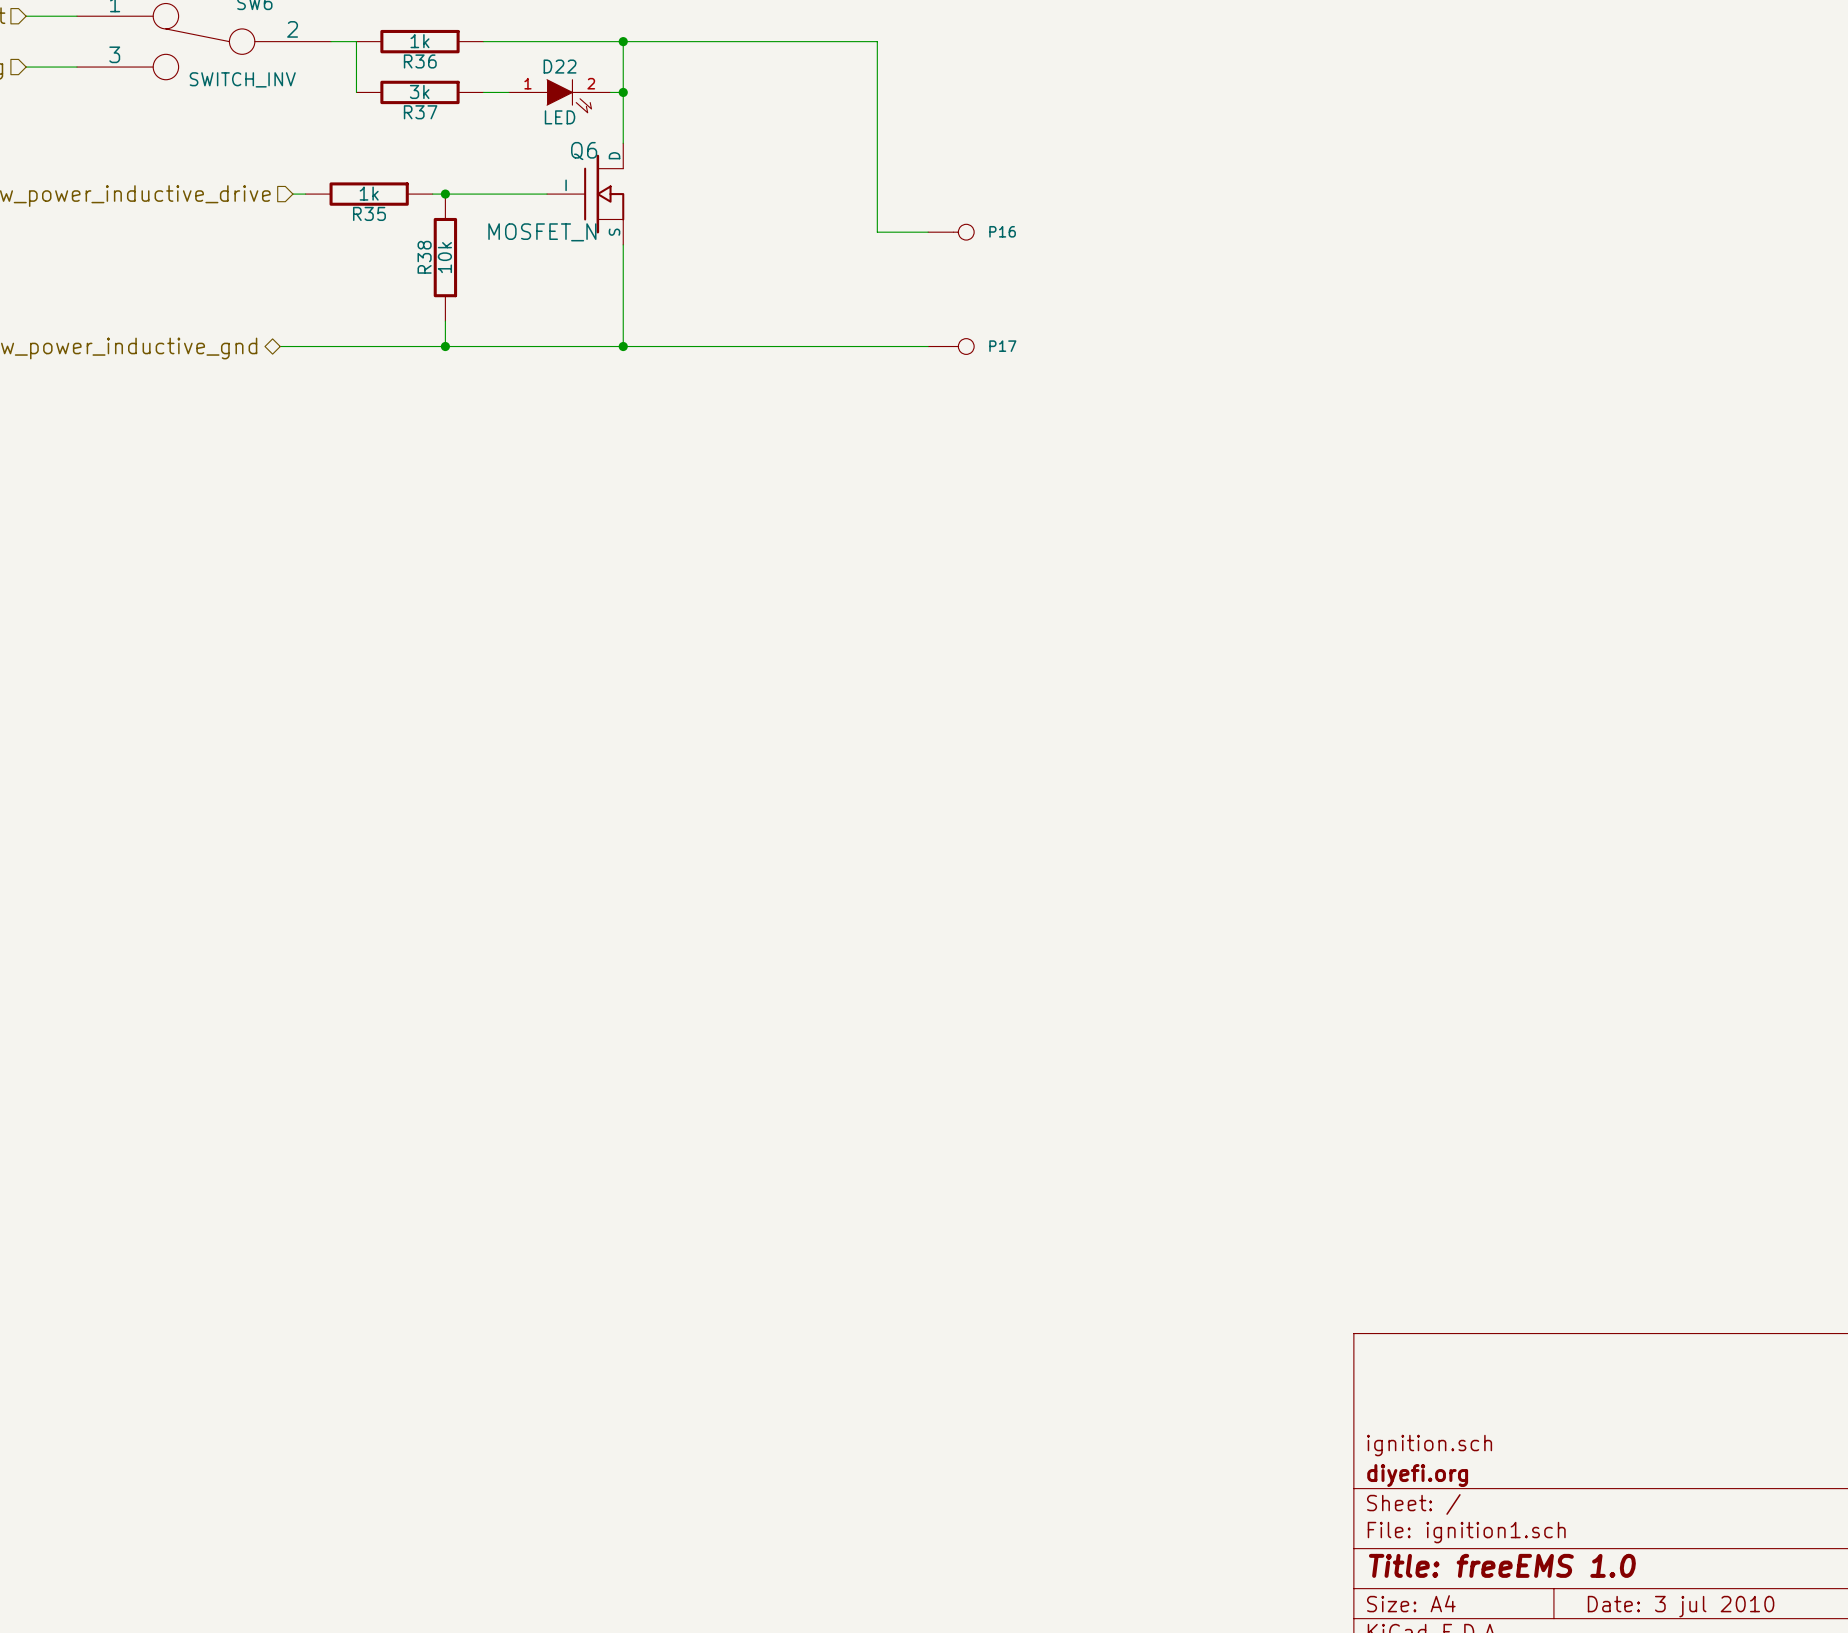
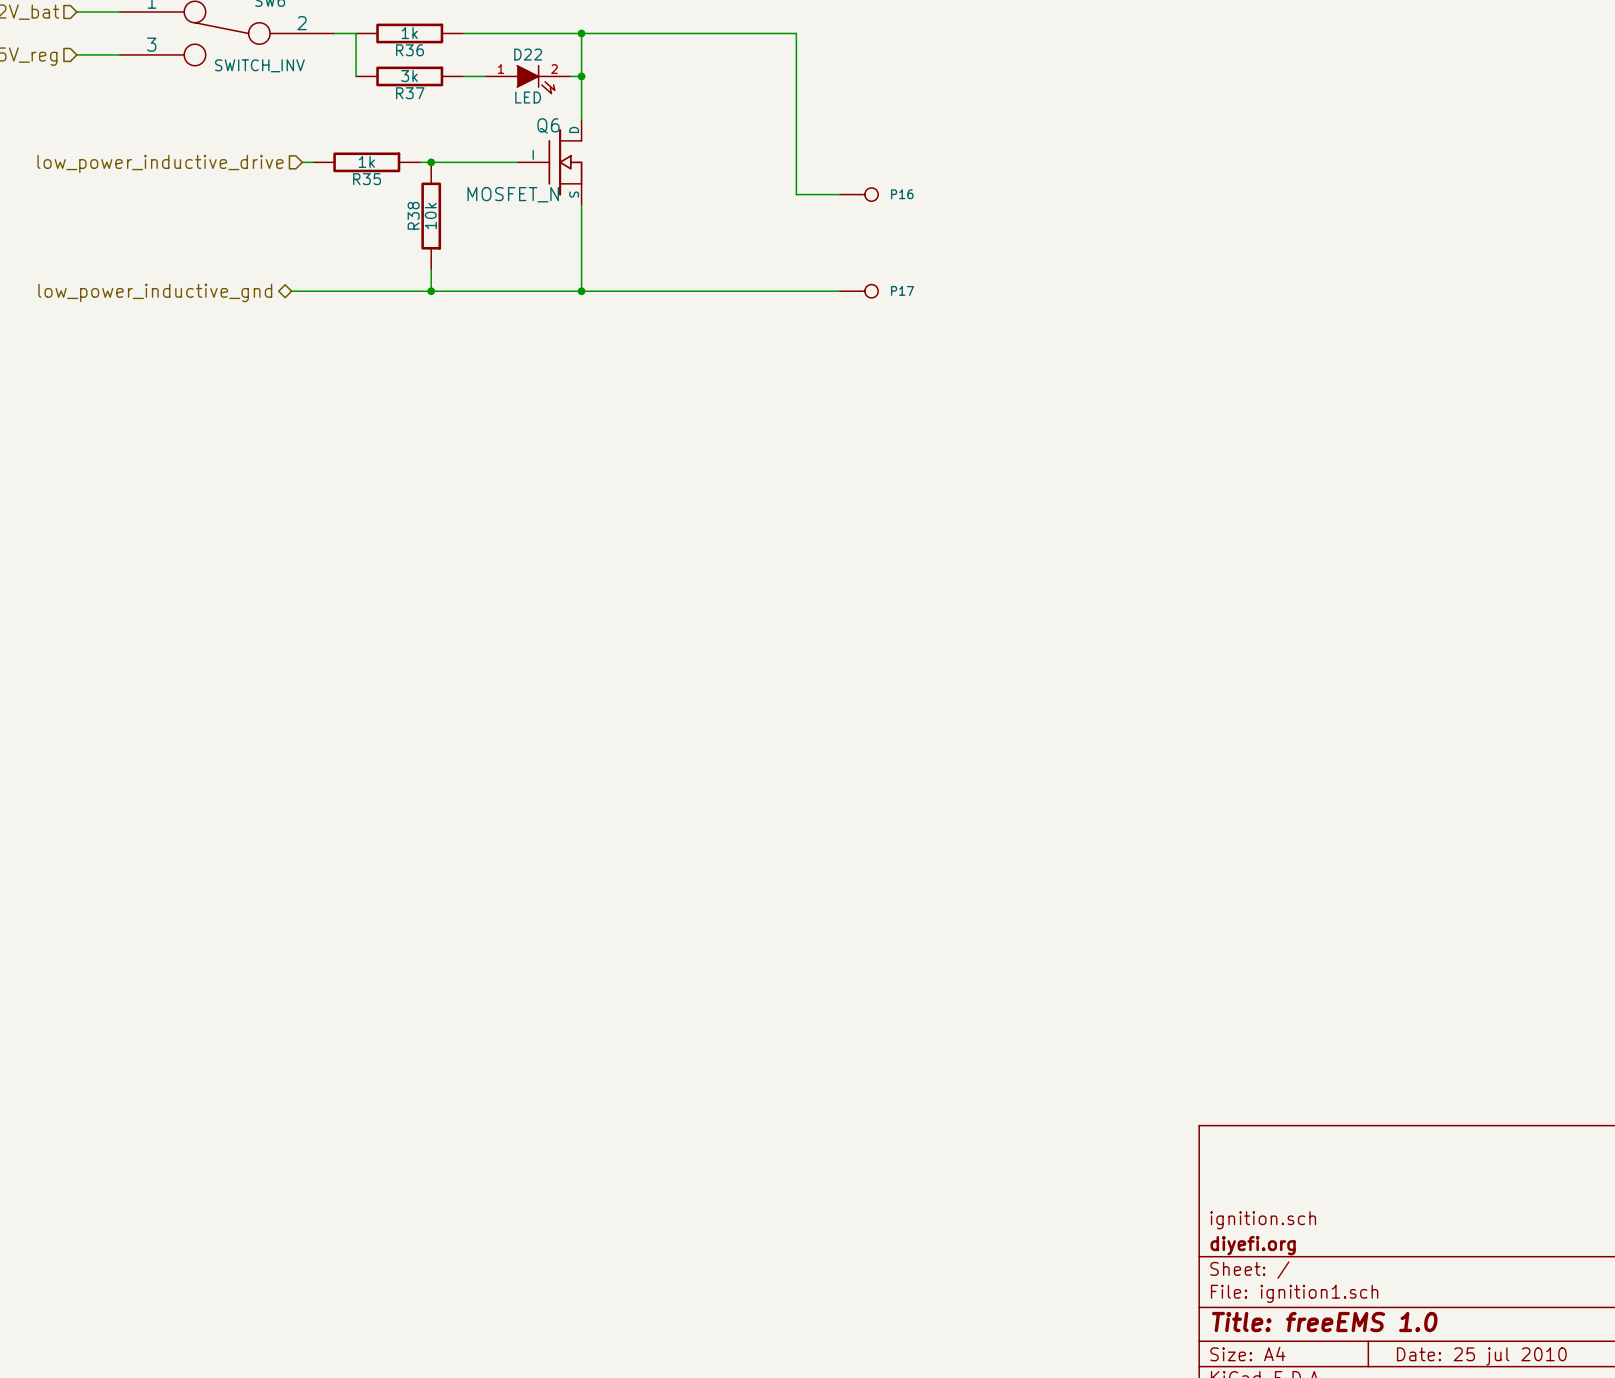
title block: Date: 3 jul 2010 (1681, 1606) -> Date: 25 jul 2010 (1481, 1356)

